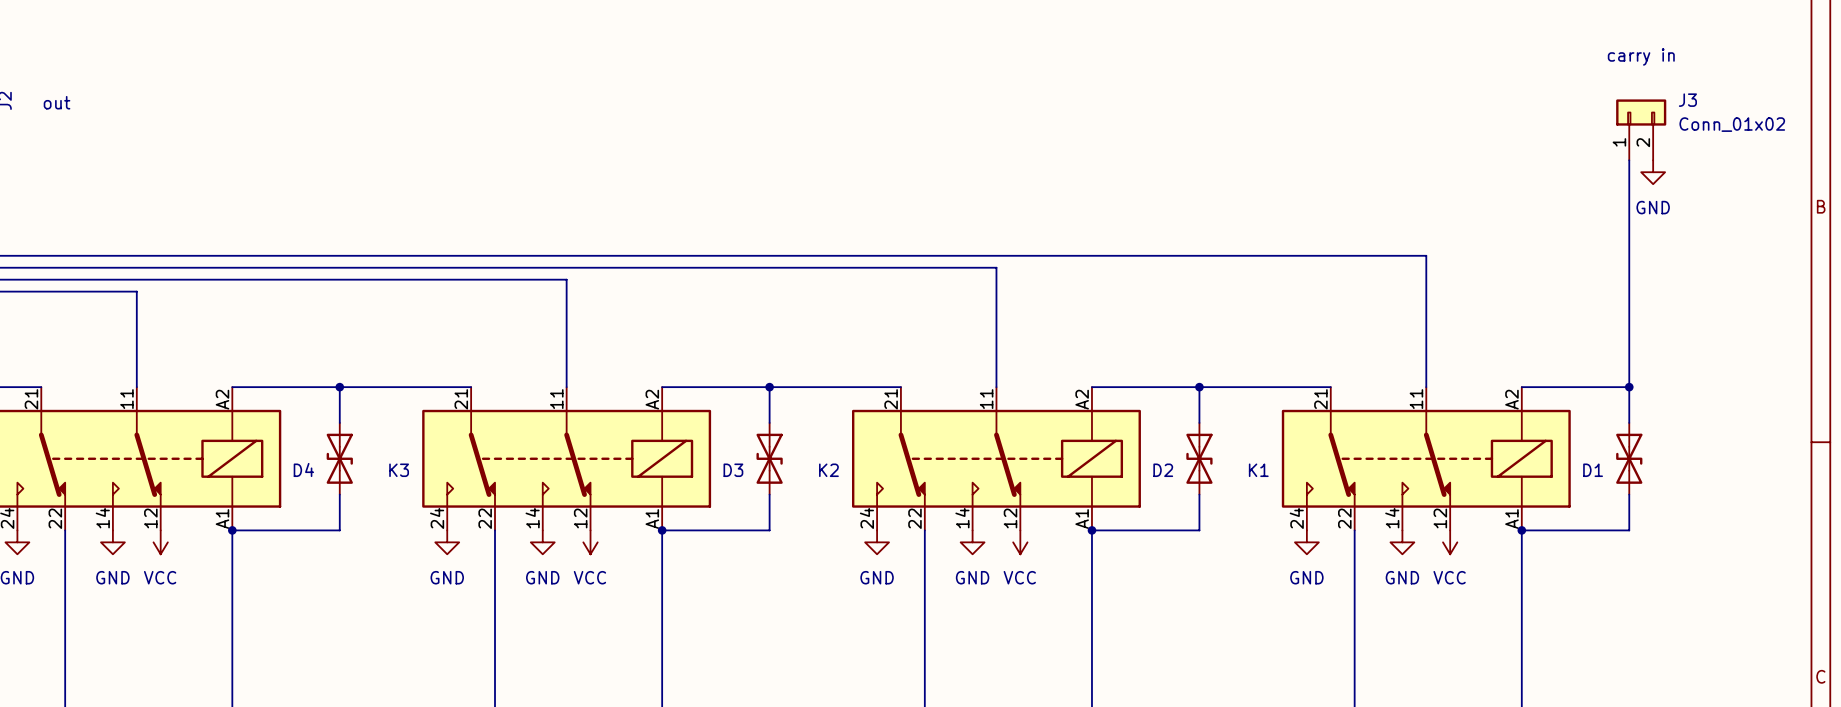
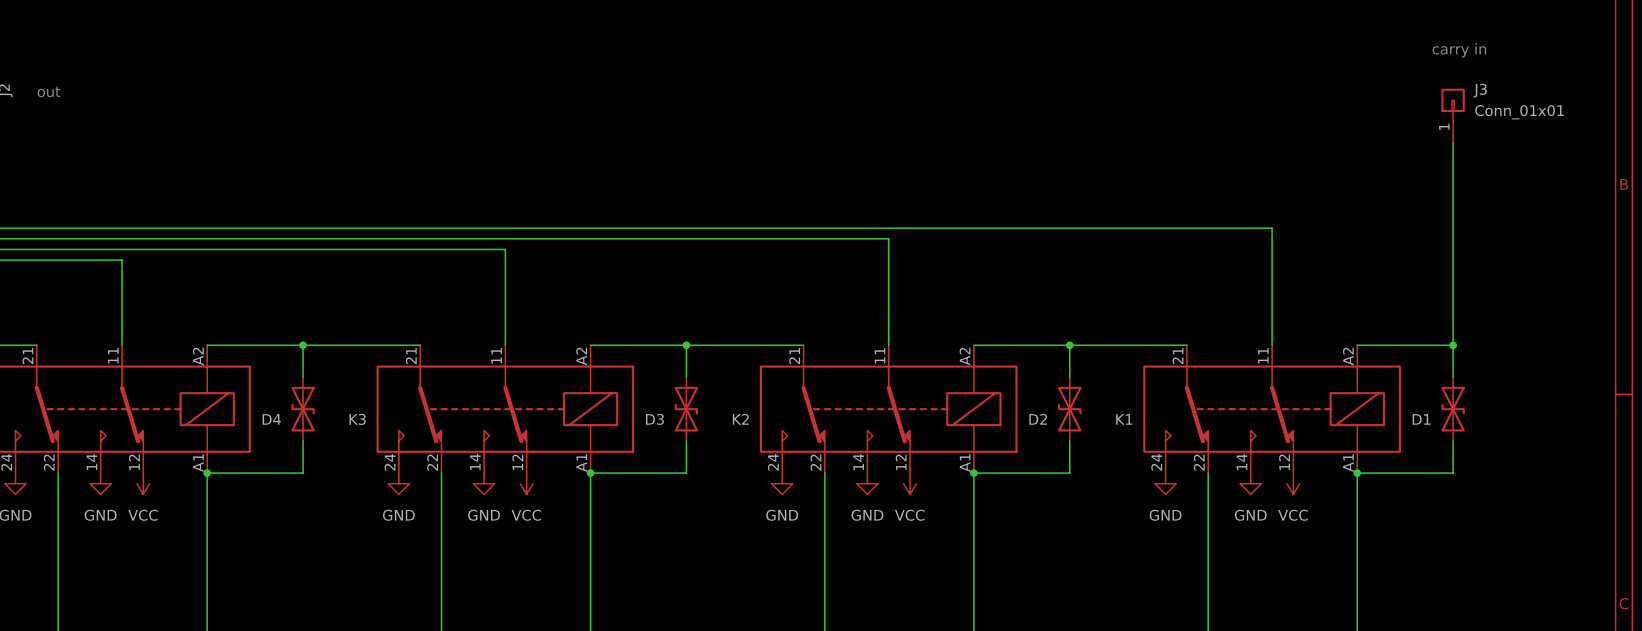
J3 symbol: [1616, 99, 1667, 161] -> [1441, 88, 1465, 143]
J3 value: Conn_01x02 (1732, 124) -> Conn_01x01 (1519, 112)
power symbol: GND (1653, 172) -> none

